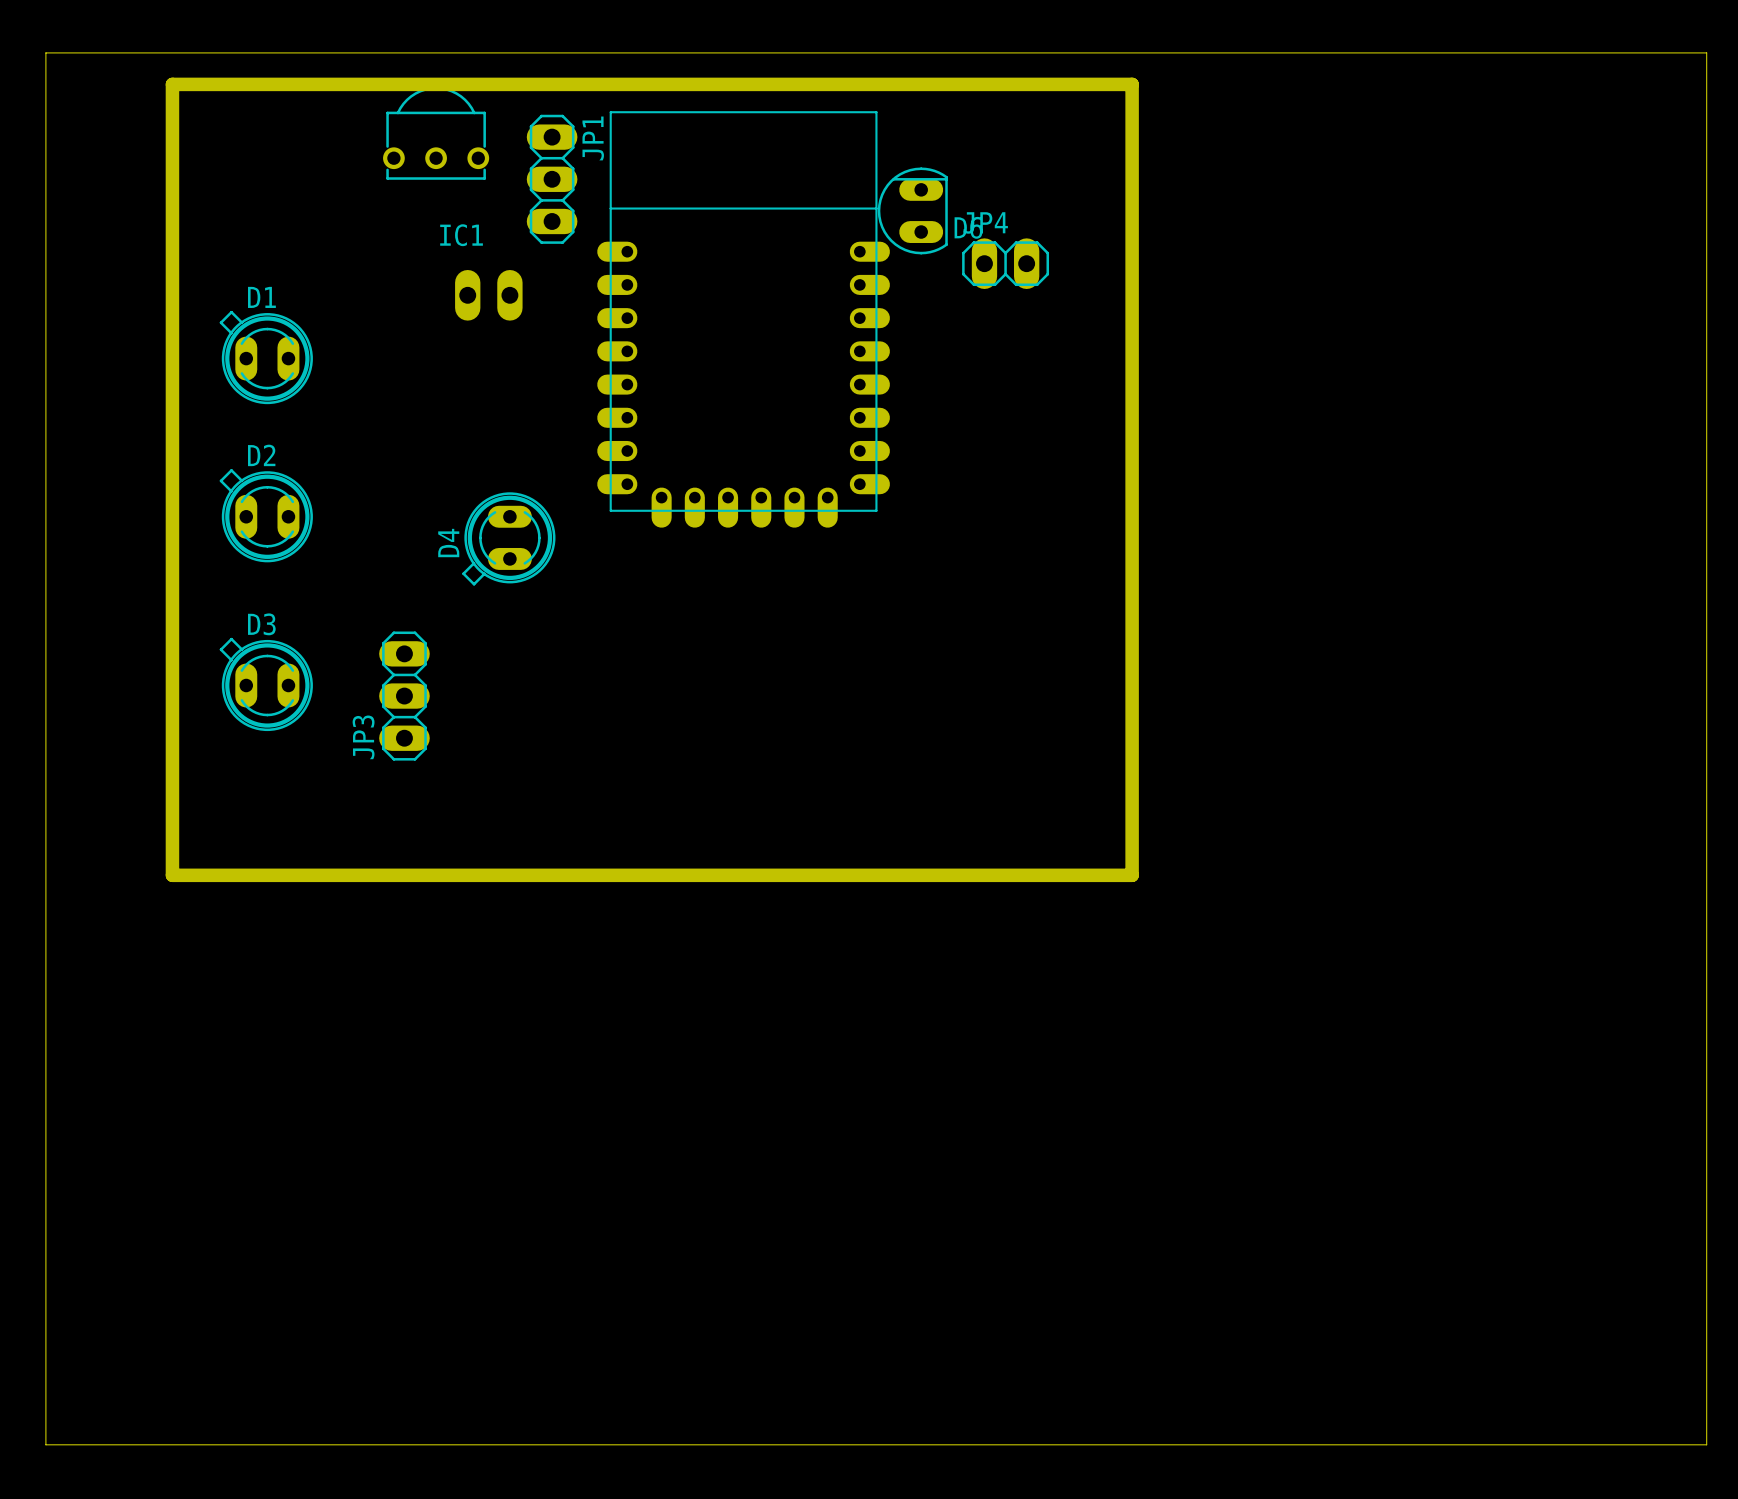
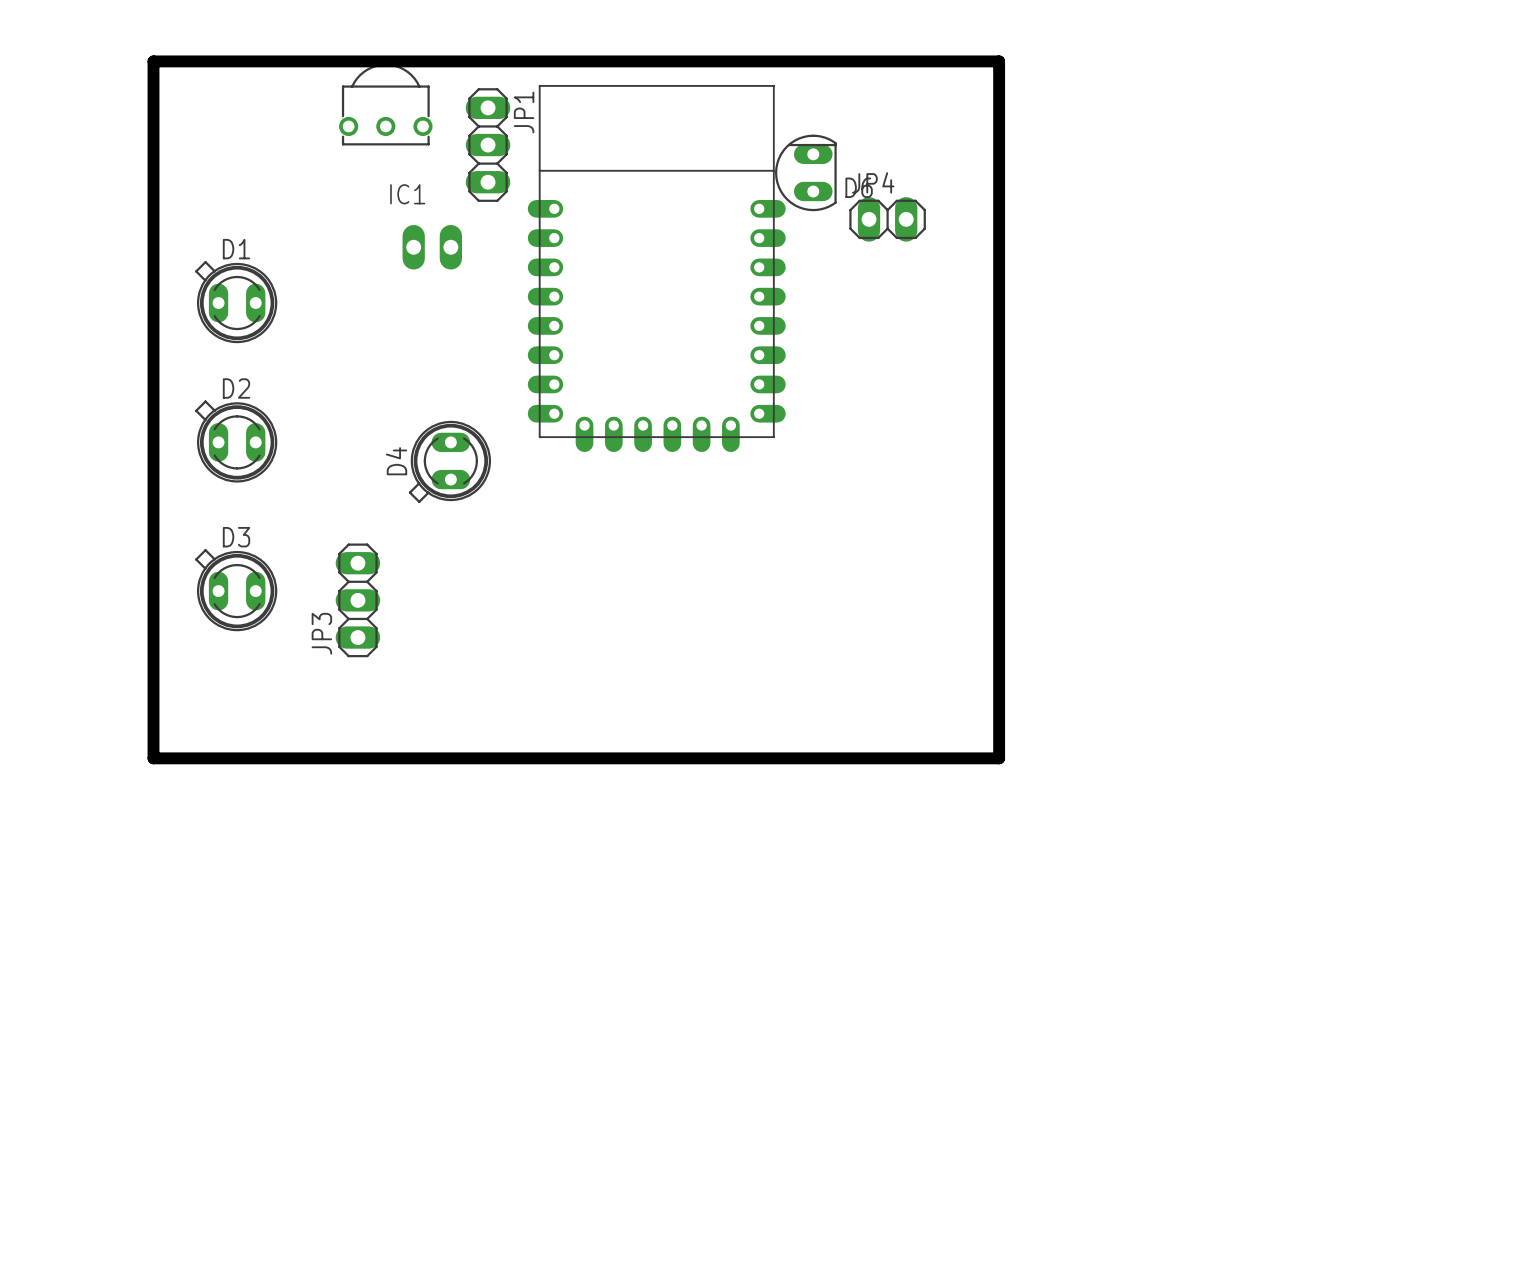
board edge: (45, 52) (1706, 52) (1706, 1444) (45, 1444) (45, 52) -> none

